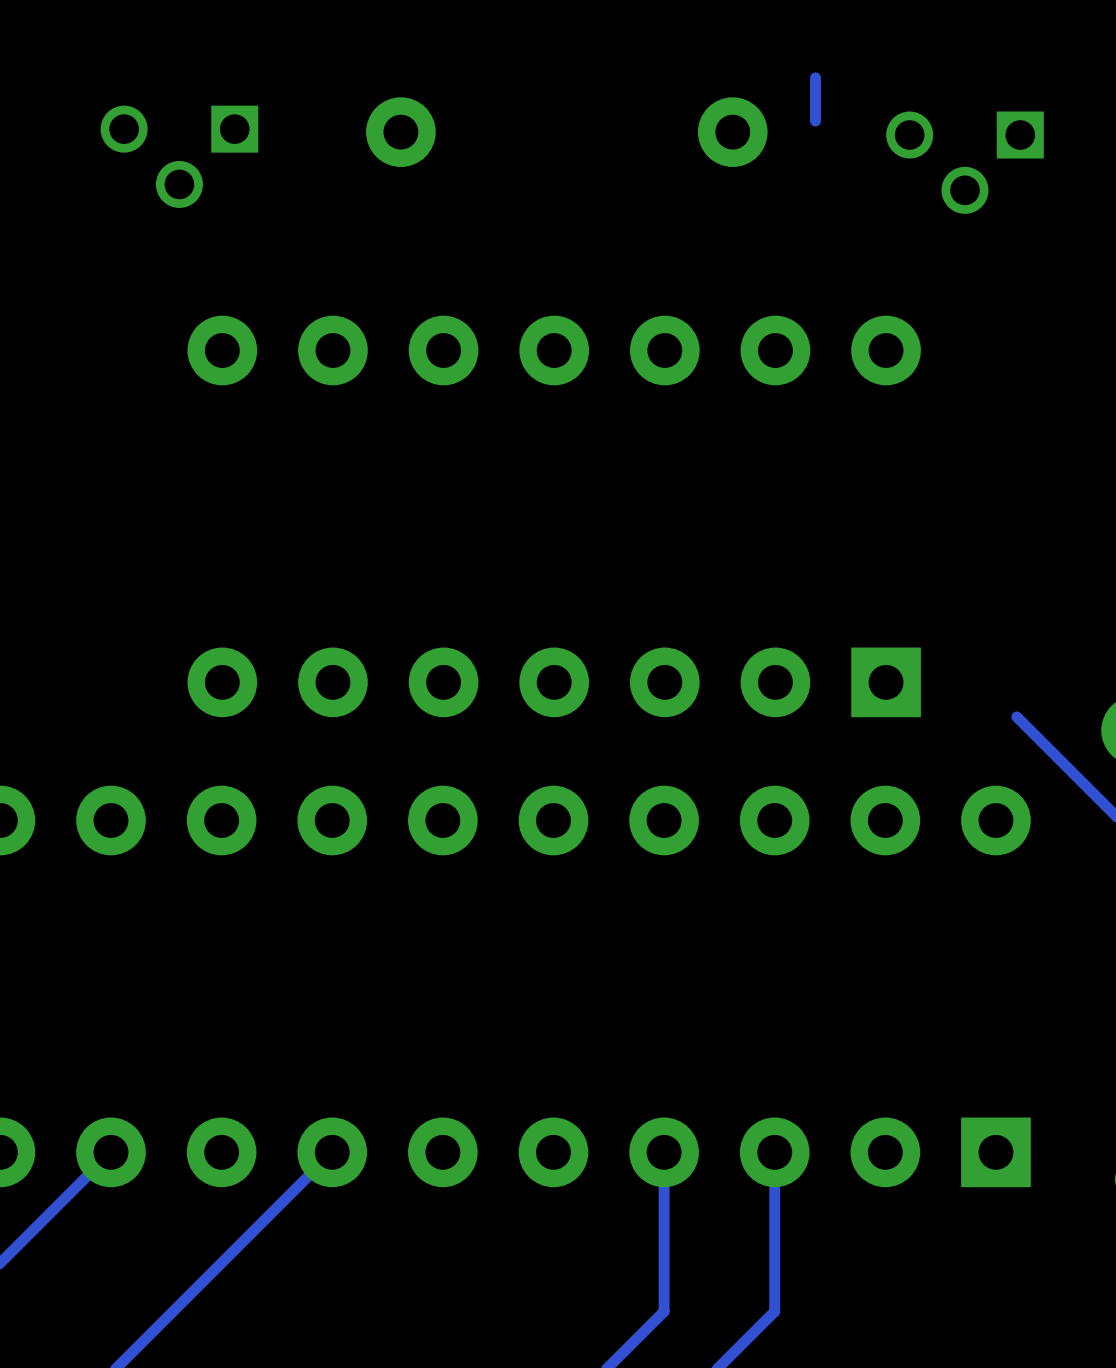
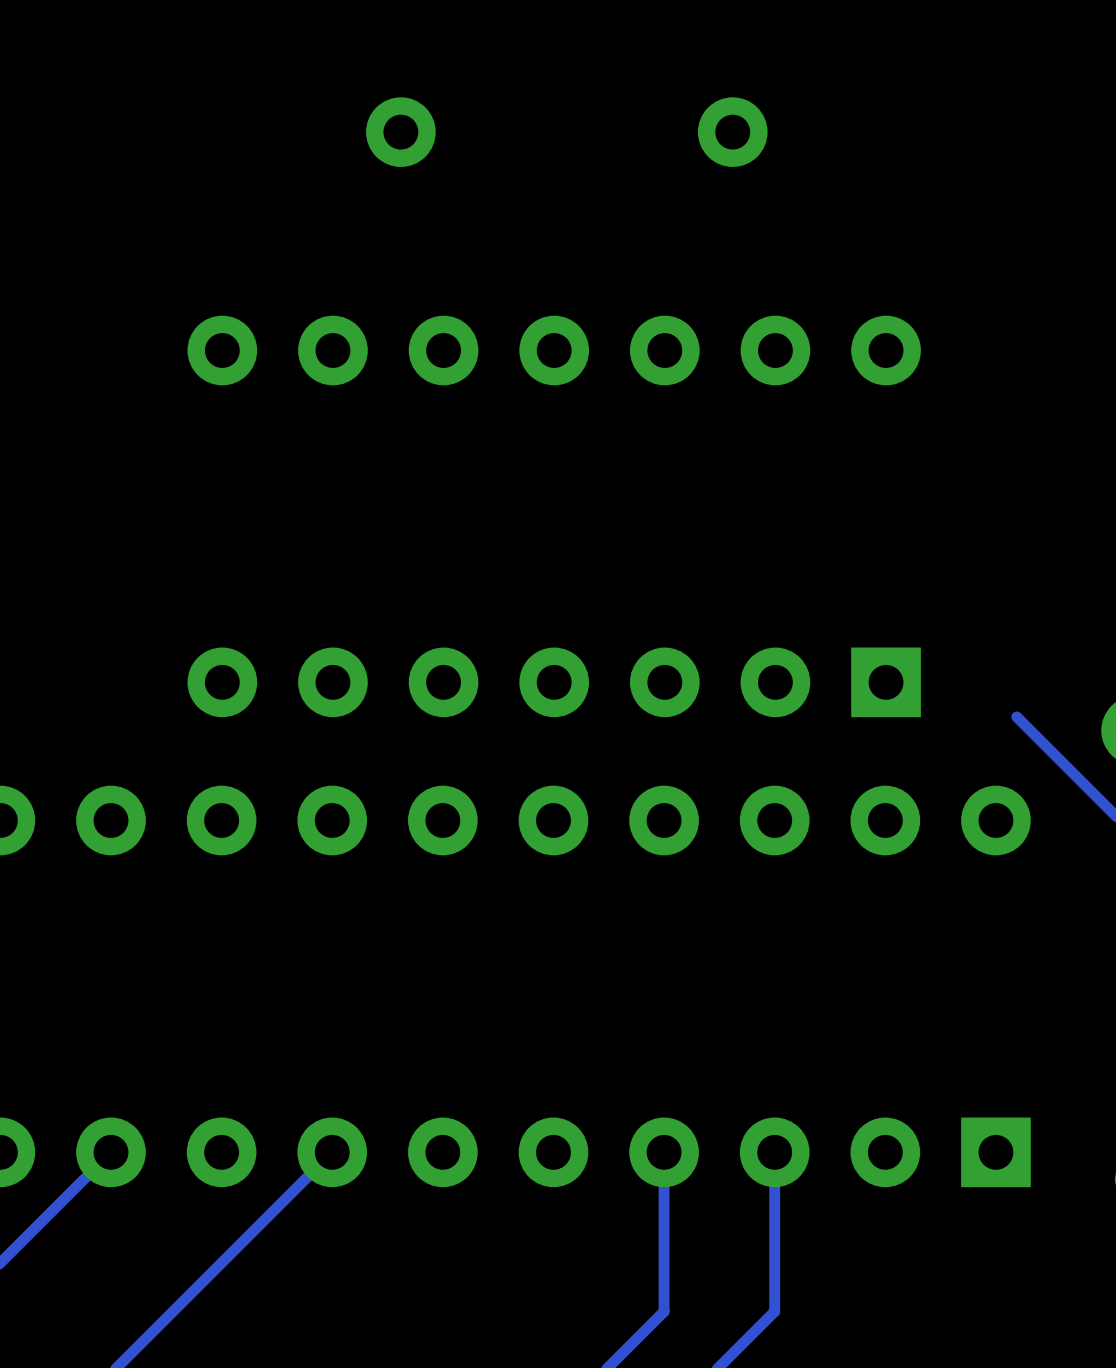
track: (815, 77) (815, 121) -> none
part: (179, 156) -> none
part: (964, 162) -> none

